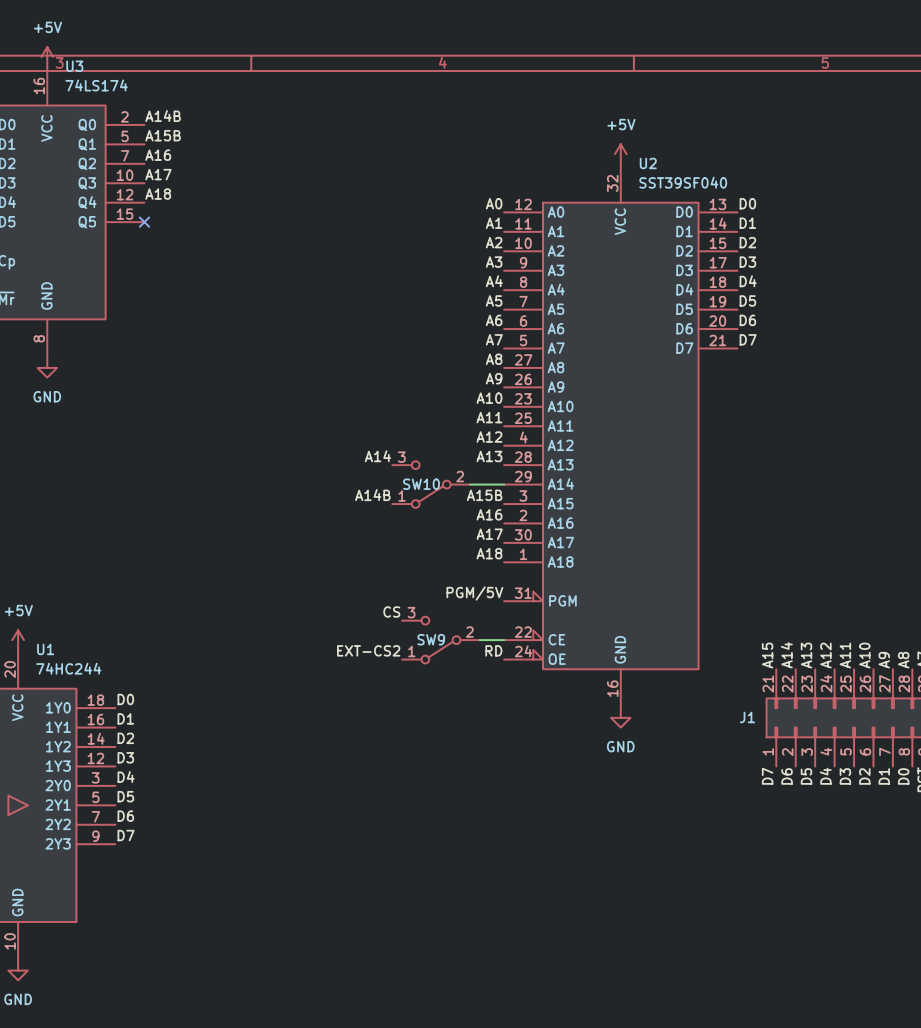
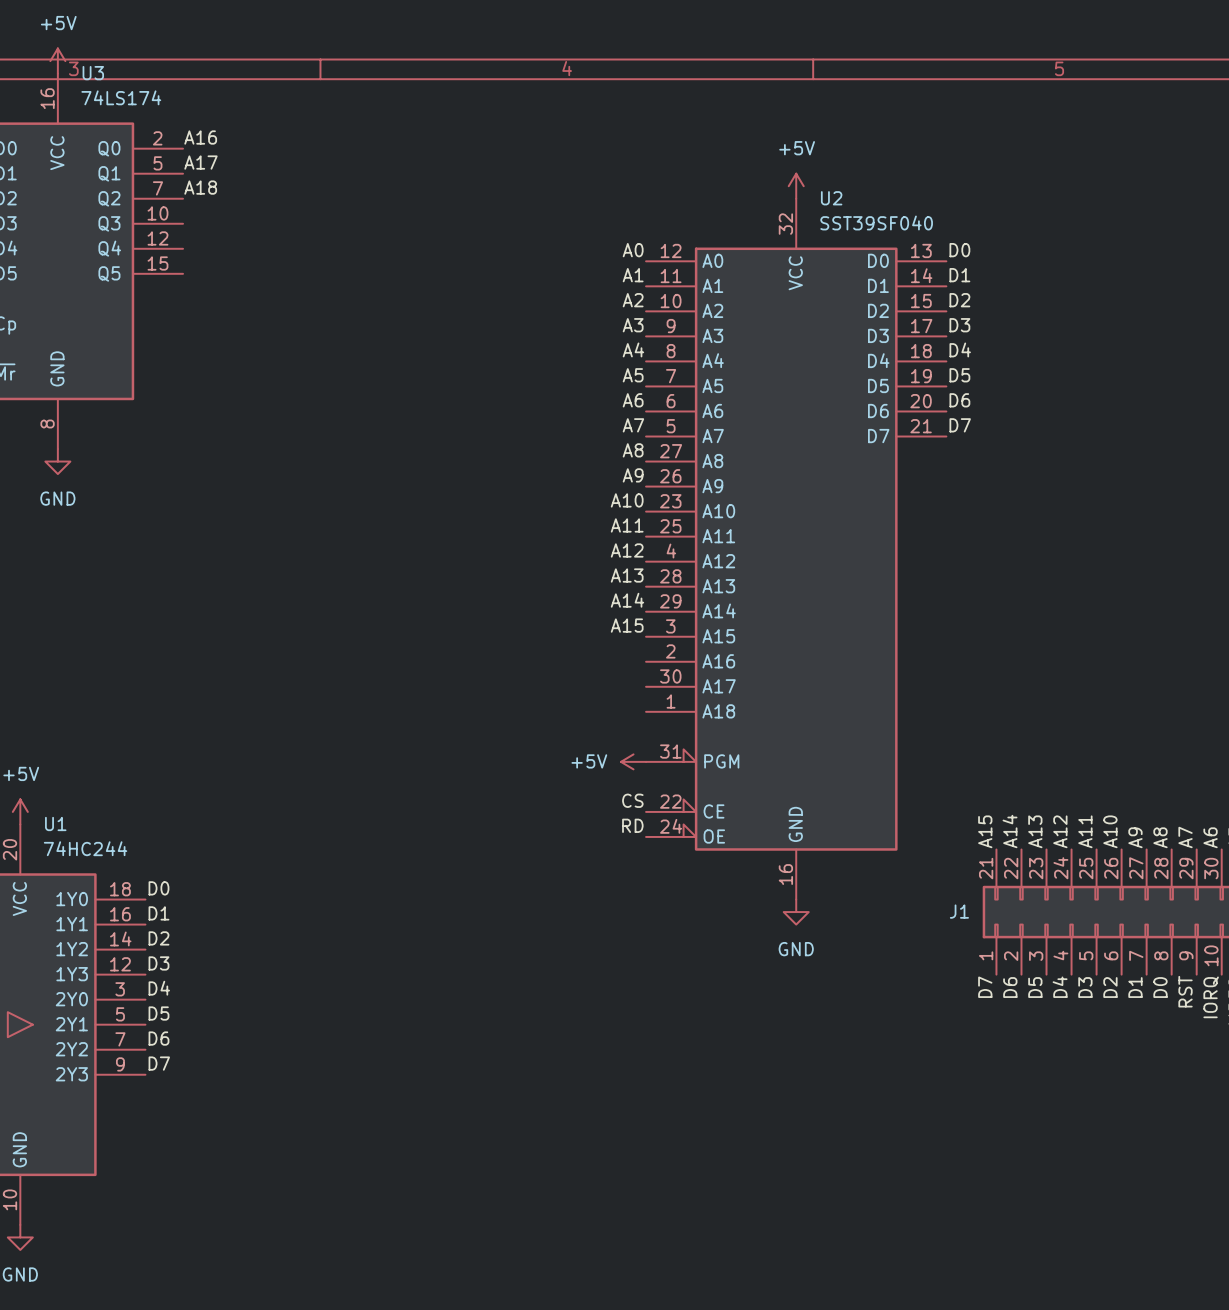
label: A14B (163, 116) -> A16 (200, 137)
label: A15B (163, 135) -> A17 (200, 162)
label: A16 (158, 155) -> A18 (200, 187)
label: A17 (158, 174) -> none
label: A18 (158, 194) -> none
no-connect mark: (144, 222) -> none
label position: A14 (377, 456) -> A14 (627, 600)
SW10: (431, 484) -> none
wire: (470, 484) (504, 484) -> none
label: A14B (372, 495) -> none
label: A15B (484, 495) -> A15 (627, 625)
label: A16 (489, 514) -> none
label: A17 (489, 534) -> none
label: A18 (489, 553) -> none
label: PGM/5V (474, 593) -> none
power symbol: none -> +5V (633, 761)
label position: CS (391, 611) -> CS (632, 800)
SW9: (440, 640) -> none
wire: (479, 640) (504, 640) -> none
label: EXT-CS2 (368, 650) -> none

